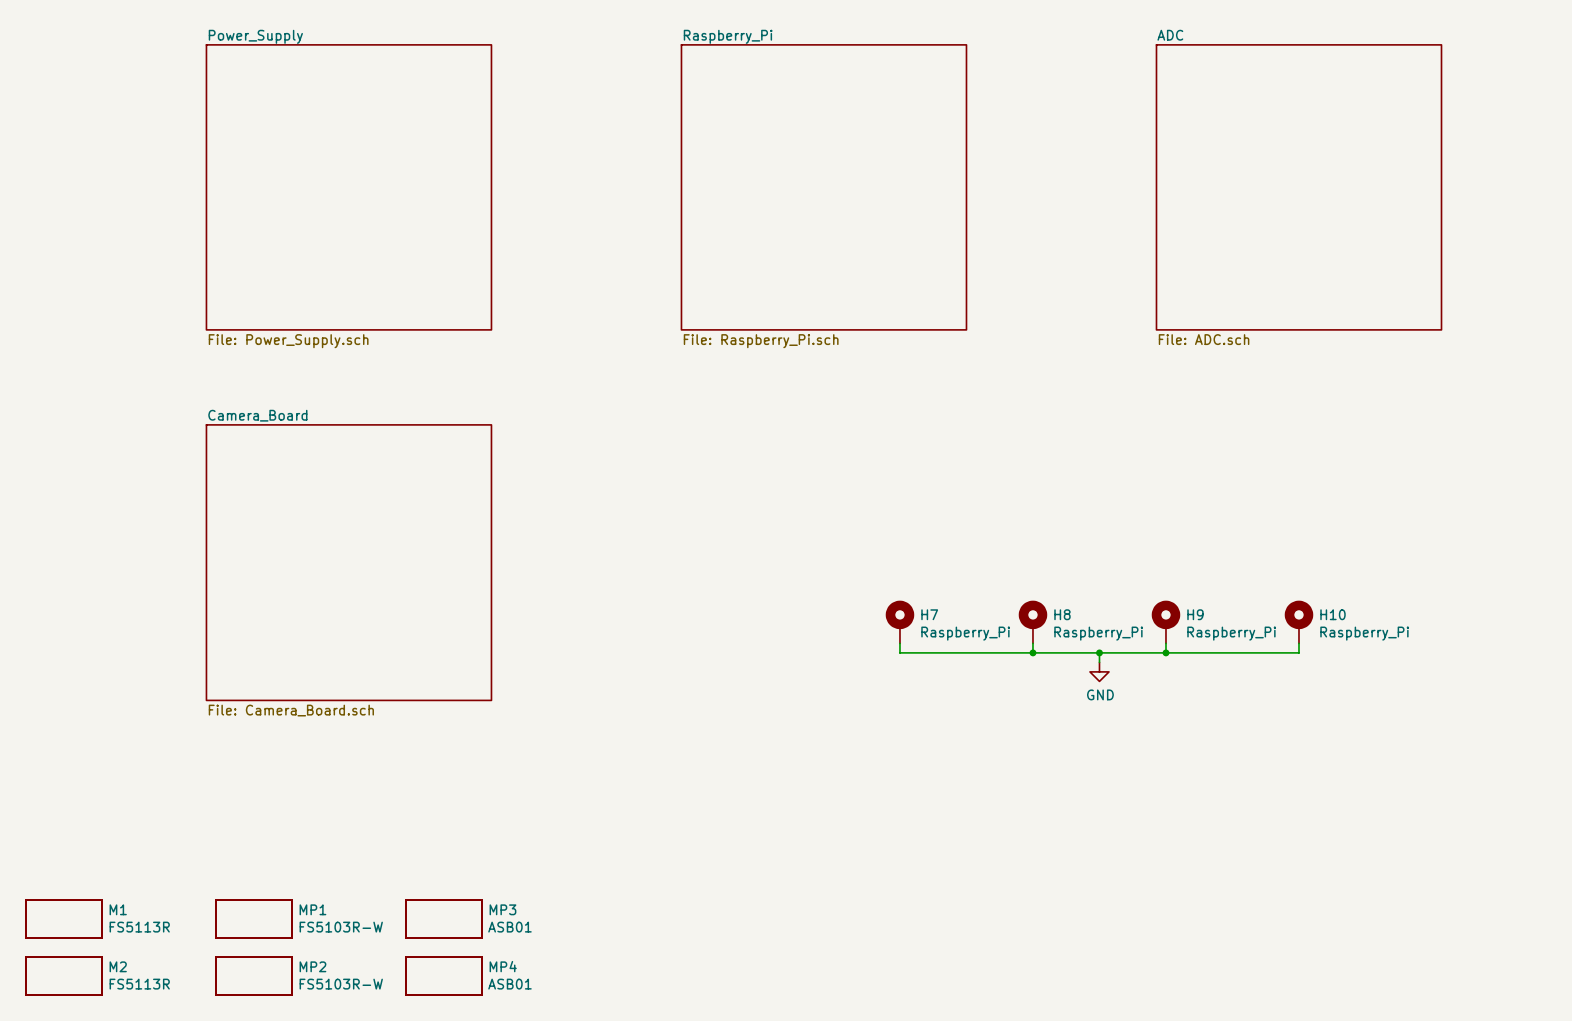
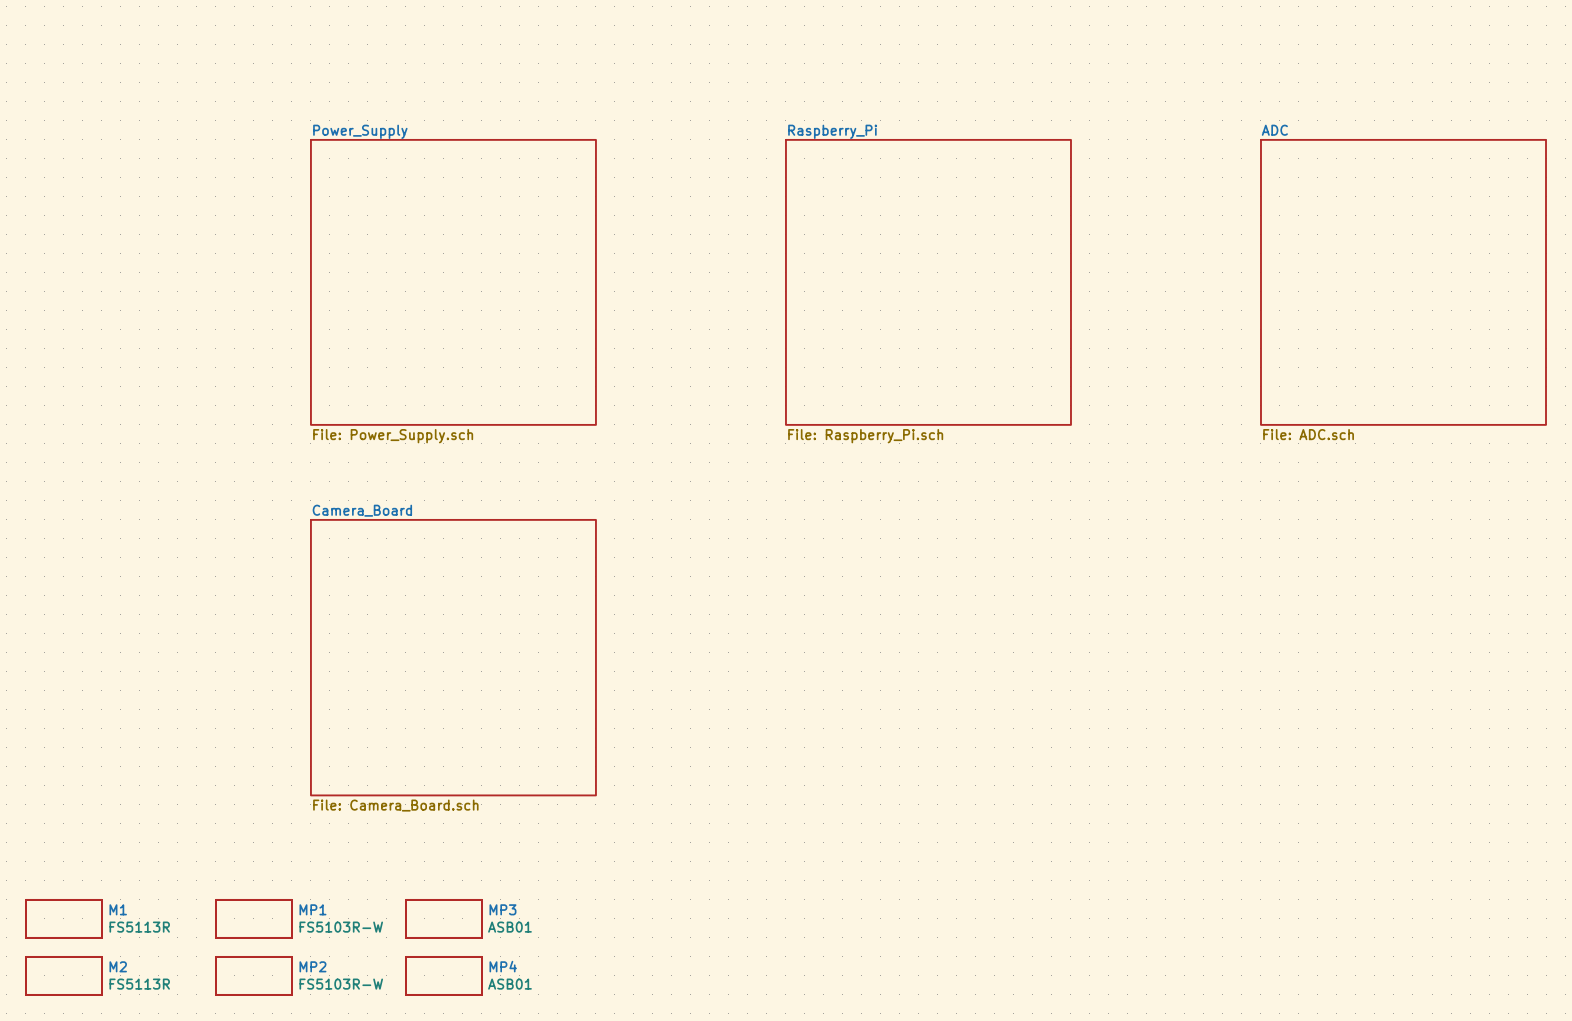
sheet Power_Supply position: (348, 187) -> (453, 282)
sheet Raspberry_Pi position: (823, 187) -> (928, 282)
sheet ADC position: (1298, 187) -> (1403, 282)
sheet Camera_Board position: (348, 562) -> (453, 657)
H7: Raspberry_Pi (899, 622) -> none
H8: Raspberry_Pi (1032, 622) -> none
H9: Raspberry_Pi (1165, 622) -> none
H10: Raspberry_Pi (1298, 622) -> none
wire: (899, 643) (899, 652) (1298, 652) (1298, 643) -> none
wire: (1032, 643) (1032, 652) -> none
wire: (1165, 643) (1165, 652) -> none
junction: (1032, 652) -> none
wire: (1099, 652) (1099, 662) -> none
junction: (1099, 652) -> none
junction: (1165, 652) -> none
power symbol: GND (1099, 671) -> none

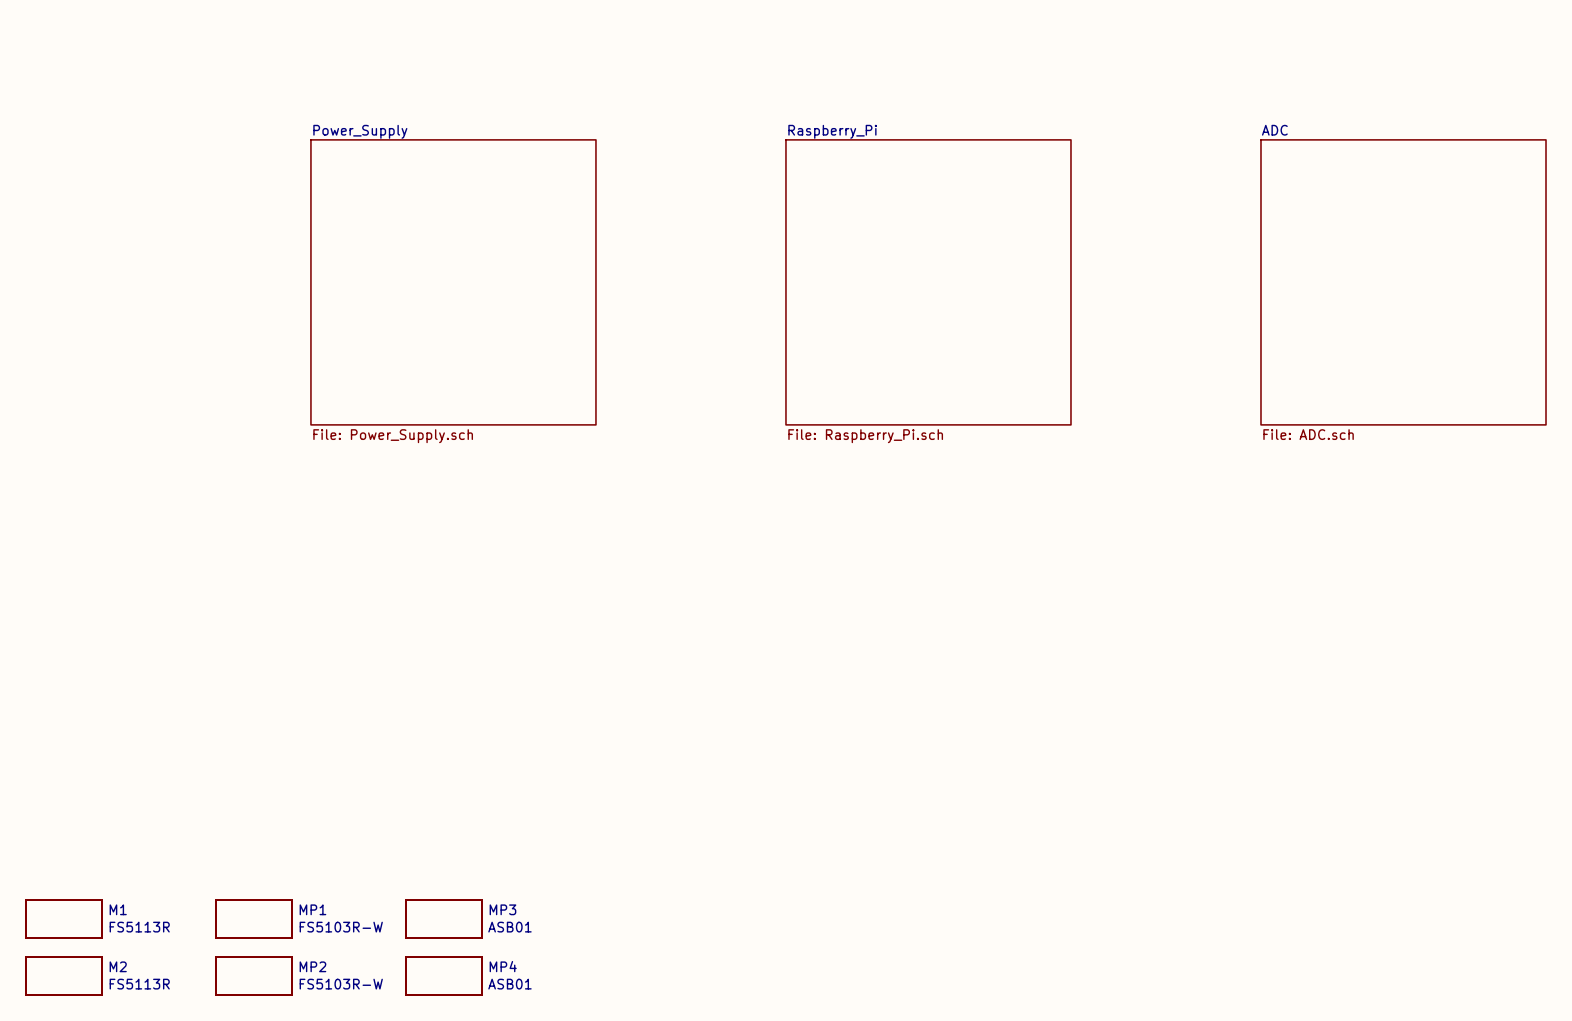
sheet Camera_Board: File: Camera_Board.sch (453, 657) -> none

